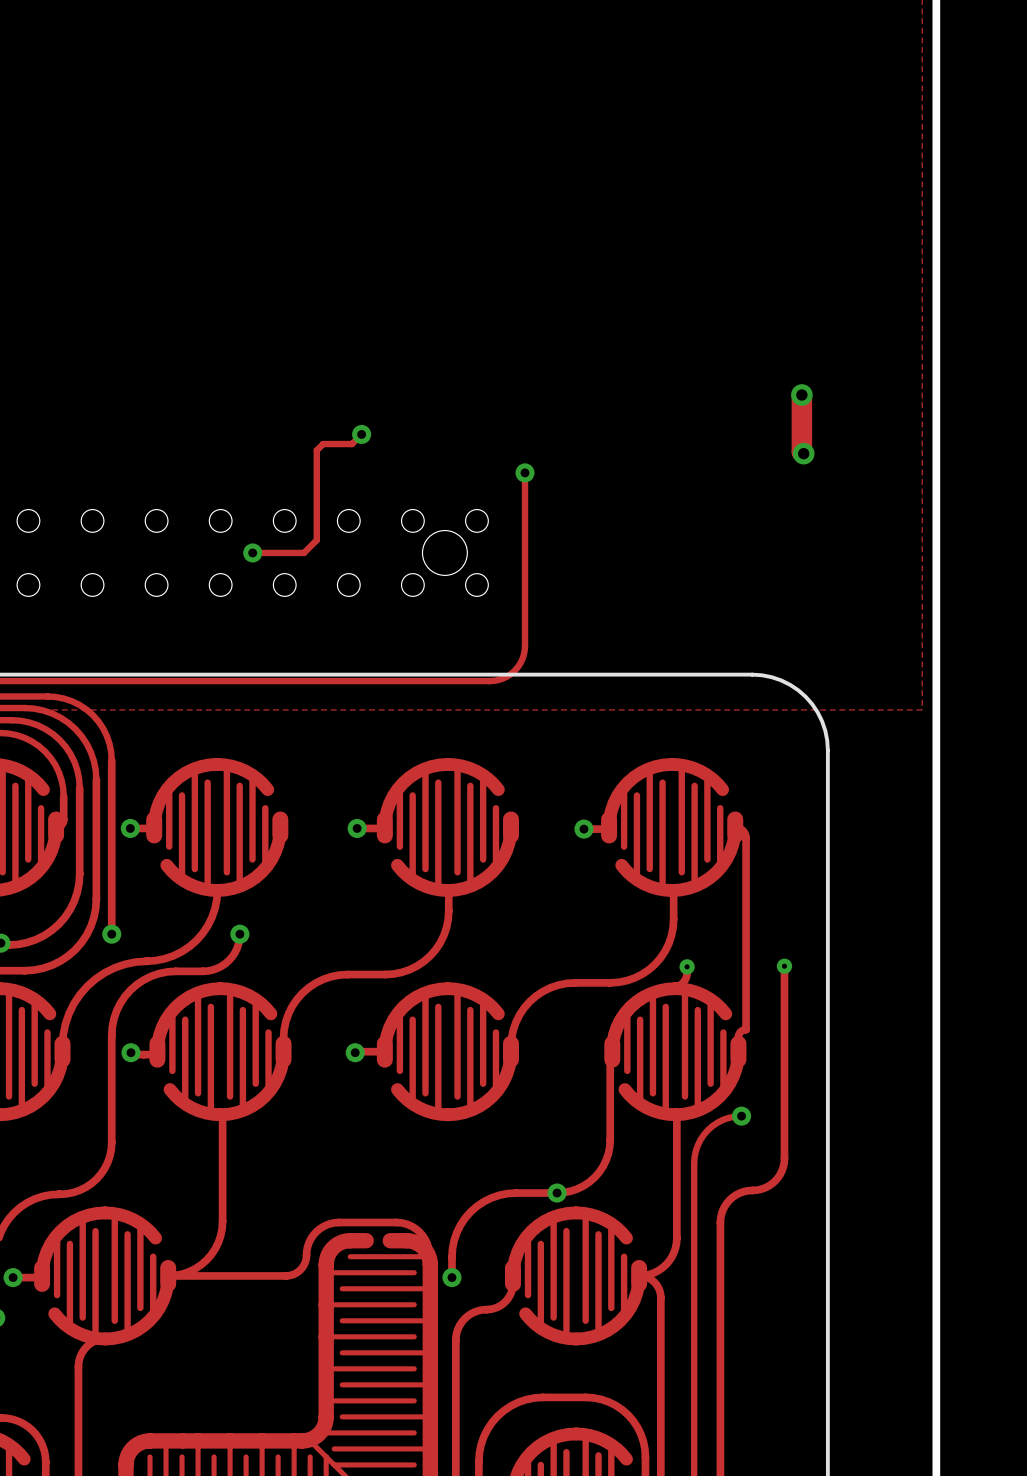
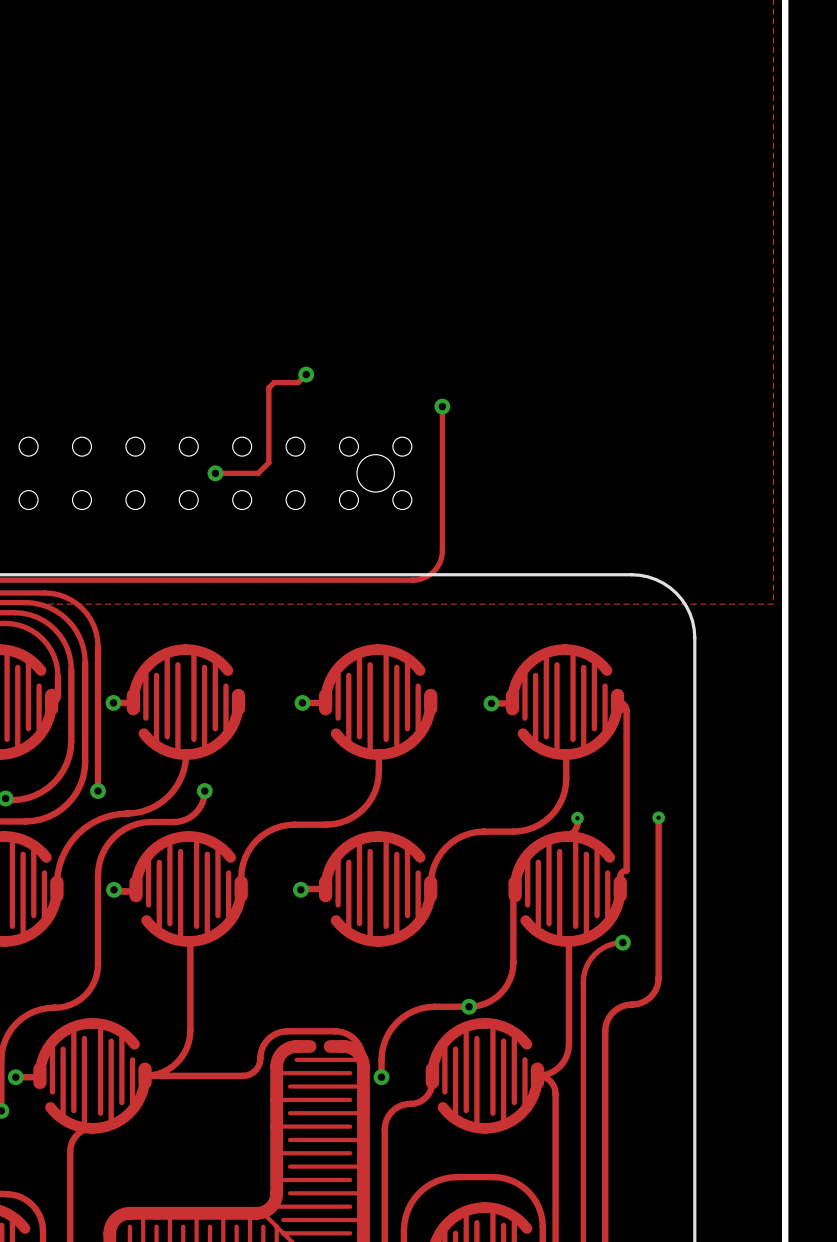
track: (801, 395) (801, 451) (803, 453) -> none
via: (801, 395) -> none
via: (803, 453) -> none

